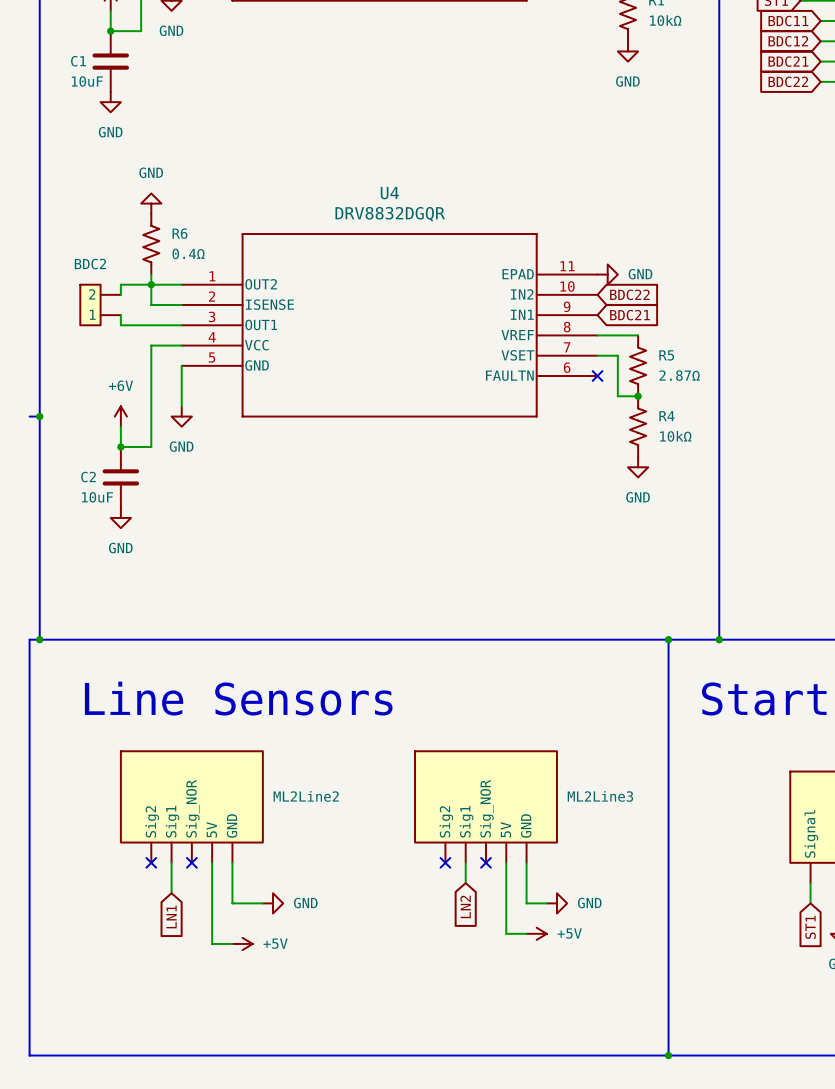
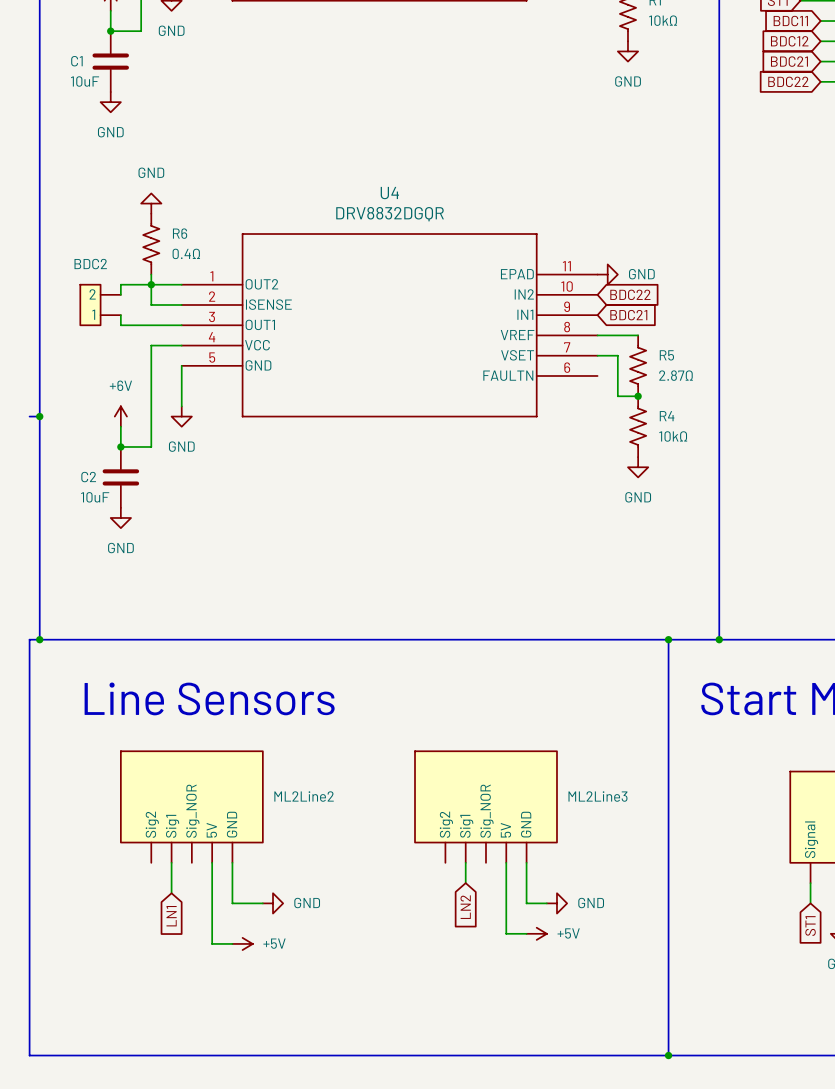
no-connect mark: (597, 375) -> none
no-connect mark: (151, 862) -> none
no-connect mark: (191, 862) -> none
no-connect mark: (445, 862) -> none
no-connect mark: (485, 862) -> none

